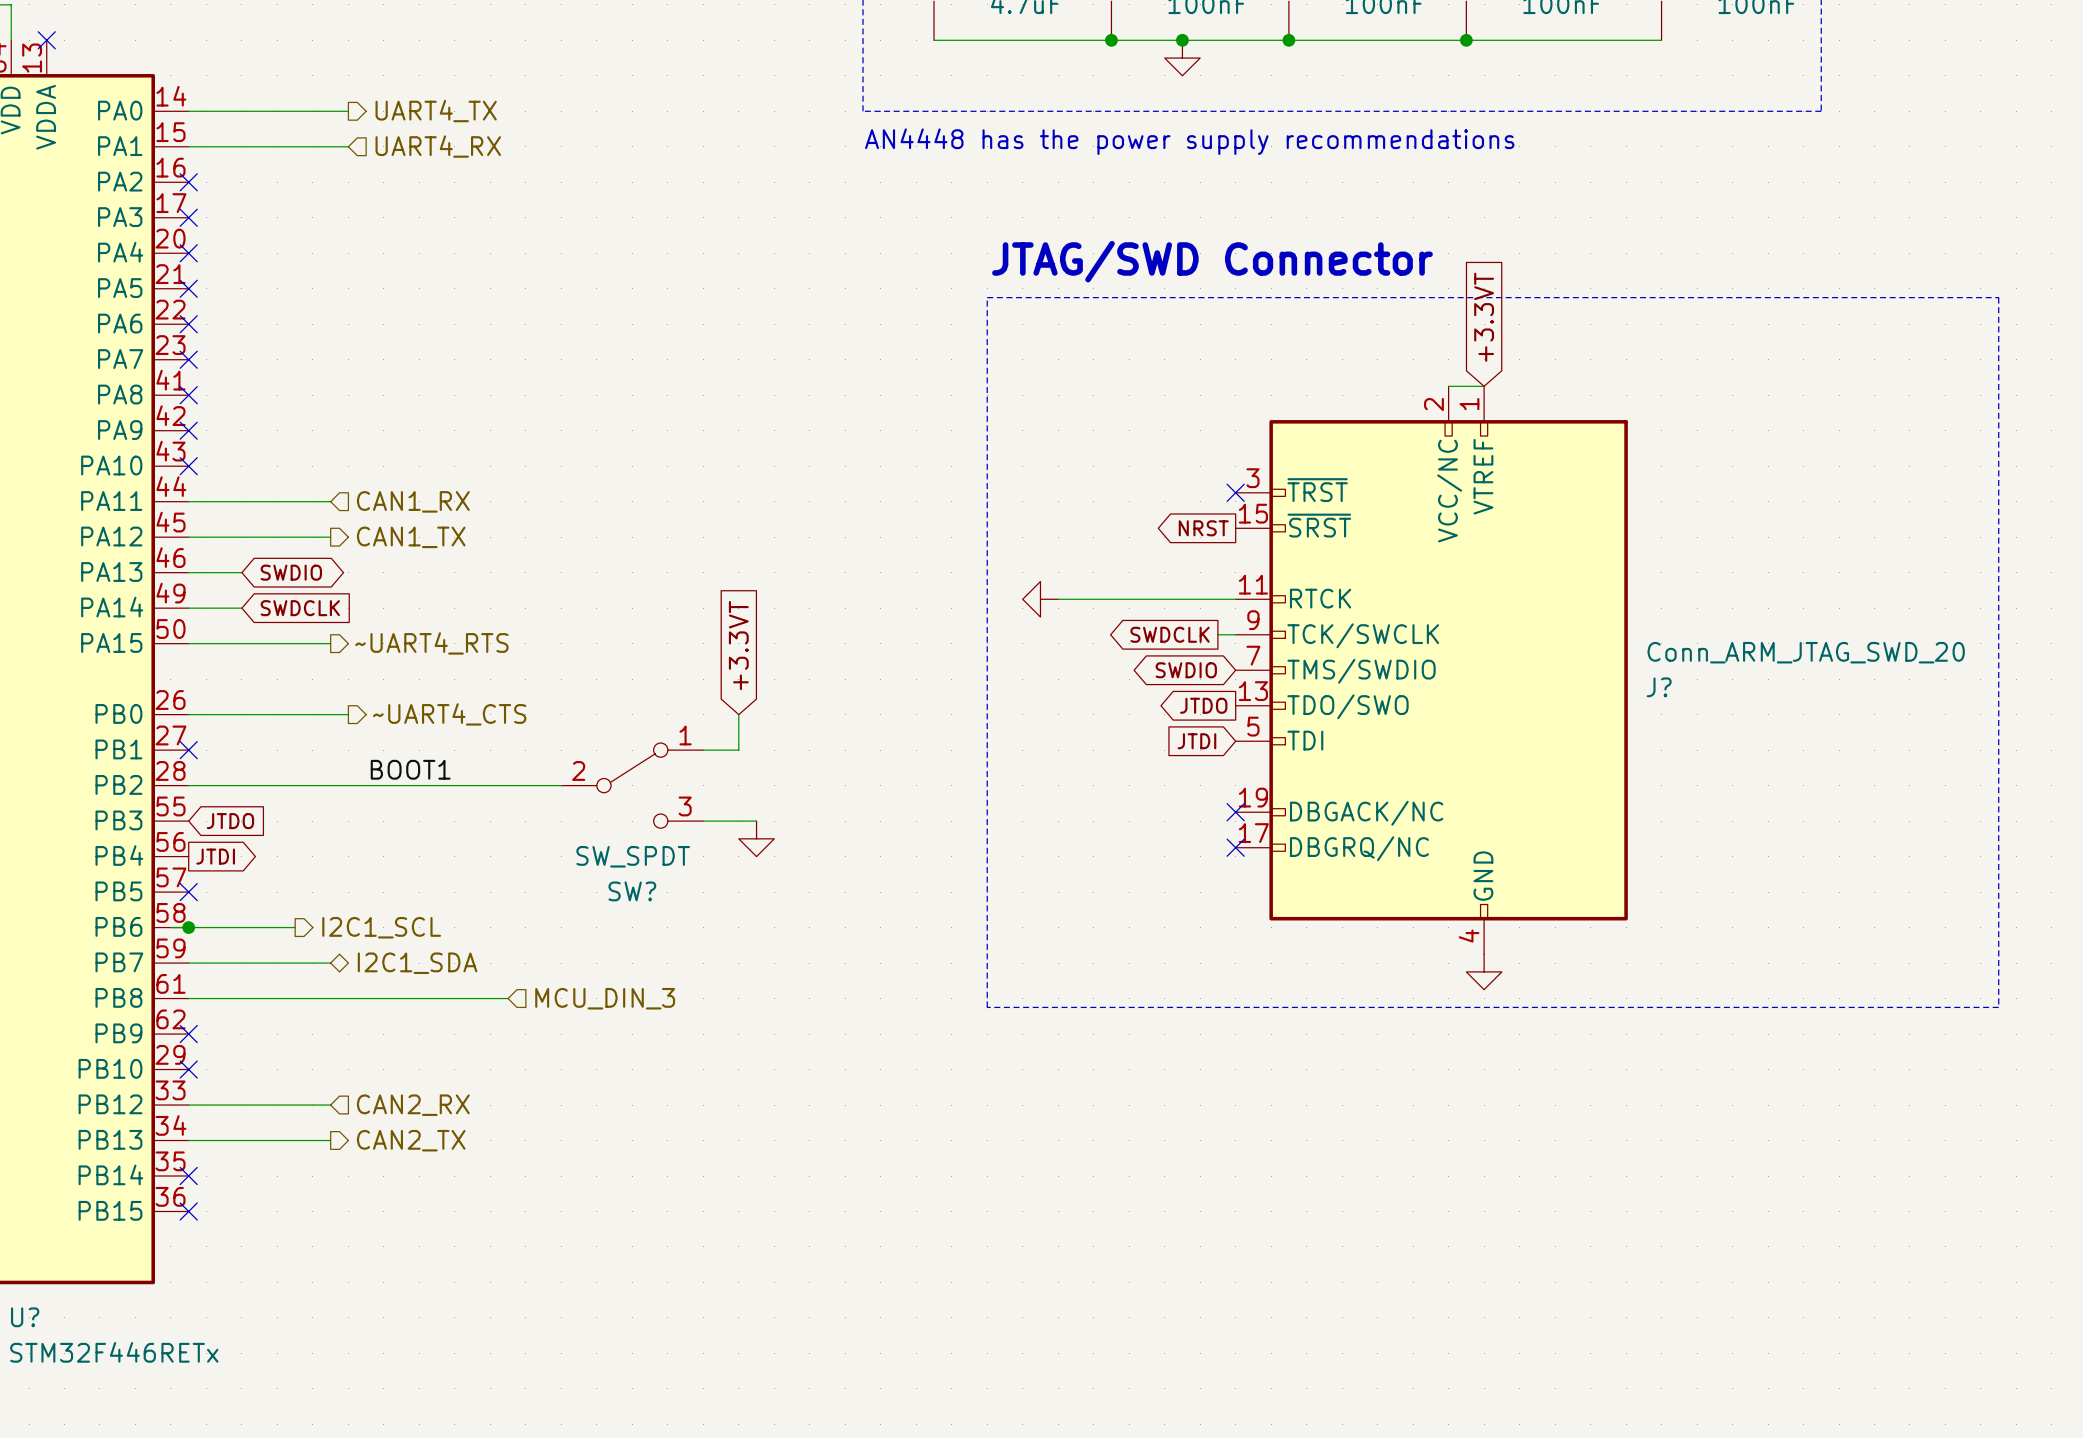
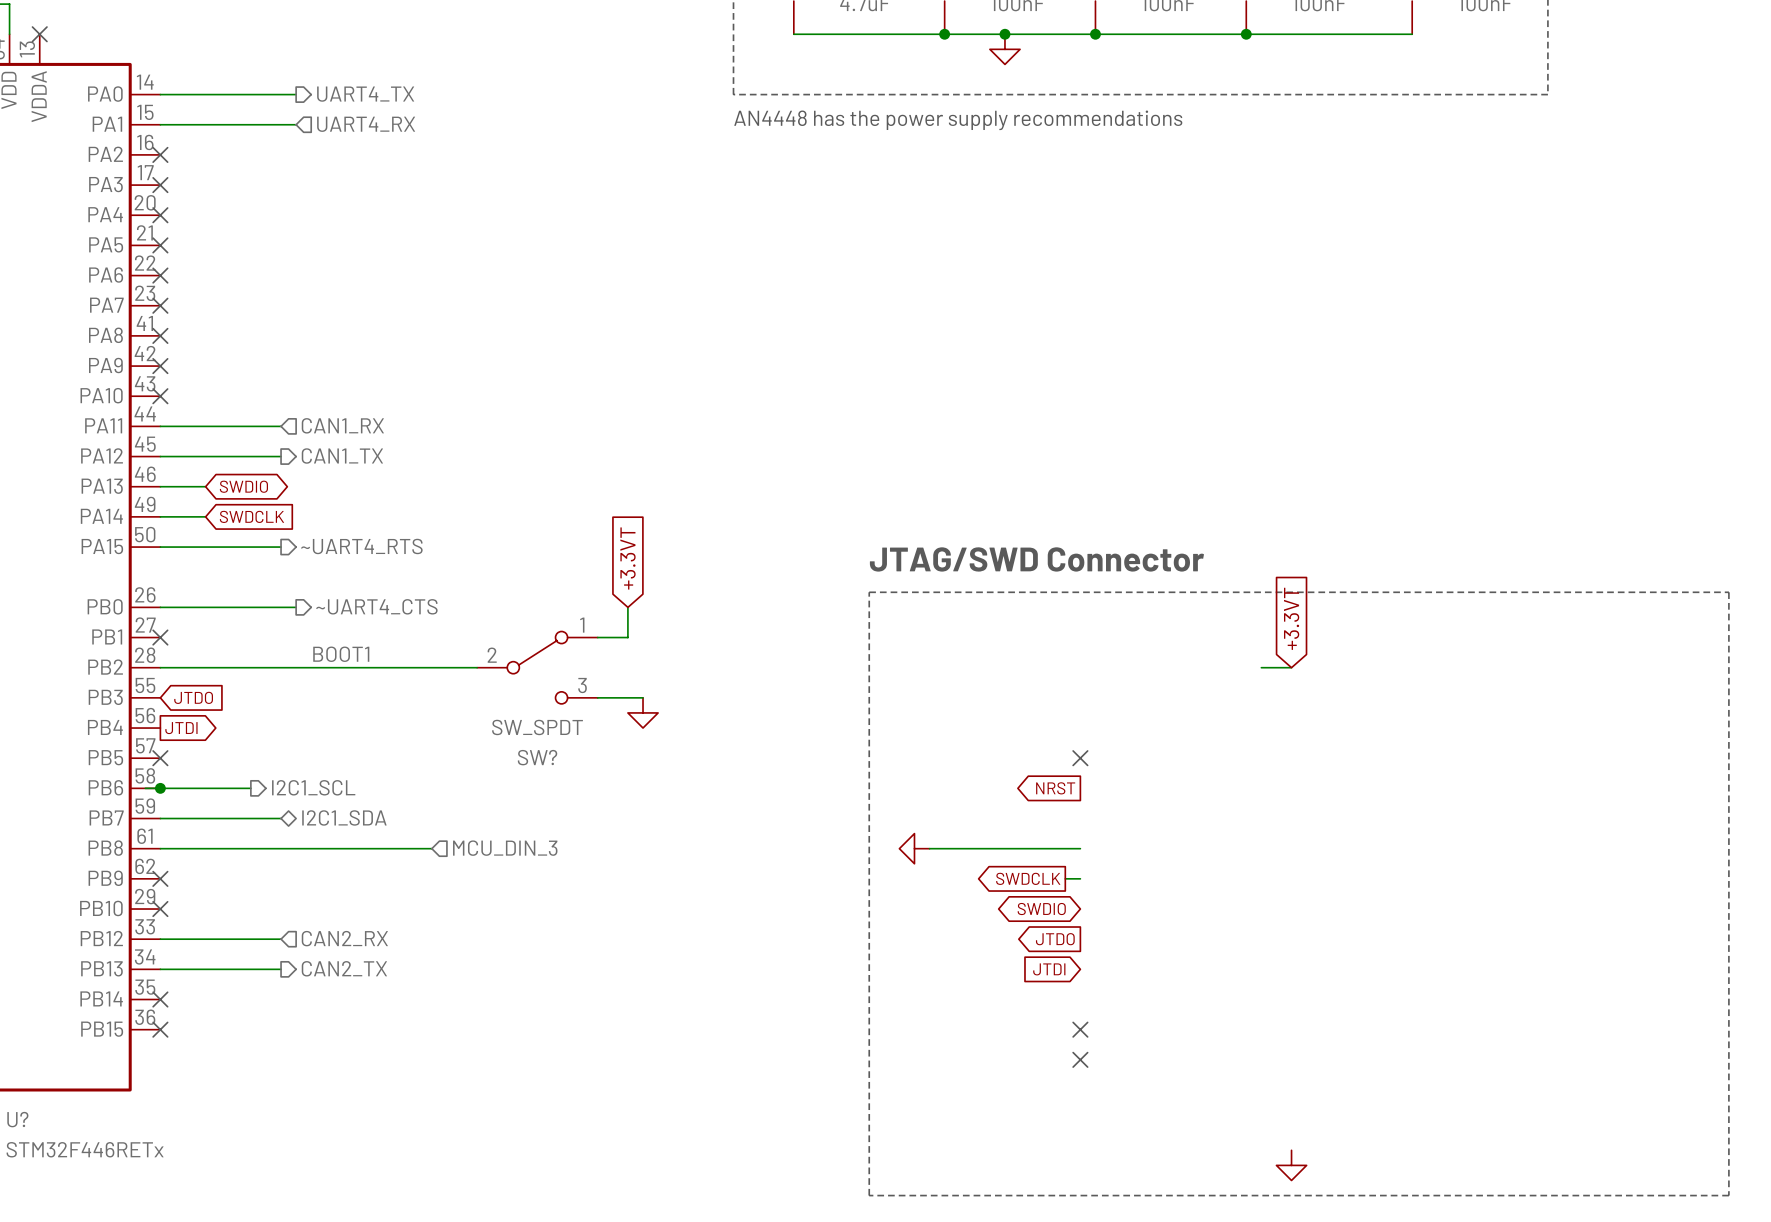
text: JTAG/SWD Connector (1212, 261) -> none
line: (987, 297) (1998, 297) (1998, 1007) (987, 1007) (987, 297) -> none
global label: +3.3VT (1484, 317) -> none
wire: (1448, 386) (1484, 386) -> none
no-connect mark: (1235, 492) -> none
global label: NRST (1203, 528) -> none
power symbol: (1040, 599) -> none
wire: (1058, 599) (1235, 599) -> none
global label: SWDCLK (1170, 634) -> none
wire: (1217, 634) (1235, 634) -> none
text: none -> JTAG/SWD Connector (1036, 559)
global label: SWDIO (1186, 670) -> none
J?: Conn_ARM_JTAG_SWD_20 (1431, 670) -> none
line: none -> (869, 592) (1728, 592) (1728, 1195) (869, 1195) (869, 592)
global label: JTDO (1203, 705) -> none
global label: none -> +3.3VT (1291, 618)
global label: JTDI (1196, 741) -> none
no-connect mark: (1235, 812) -> none
no-connect mark: (1235, 847) -> none
no-connect mark: none -> (1080, 758)
global label: none -> NRST (1055, 788)
power symbol: (1484, 971) -> none
power symbol: none -> (914, 848)
wire: none -> (929, 848) (1080, 848)
global label: none -> SWDCLK (1028, 878)
wire: none -> (1065, 878) (1080, 878)
global label: none -> SWDIO (1041, 909)
global label: none -> JTDO (1055, 939)
global label: none -> JTDI (1049, 969)
no-connect mark: none -> (1080, 1029)
no-connect mark: none -> (1080, 1059)
power symbol: none -> (1291, 1165)

